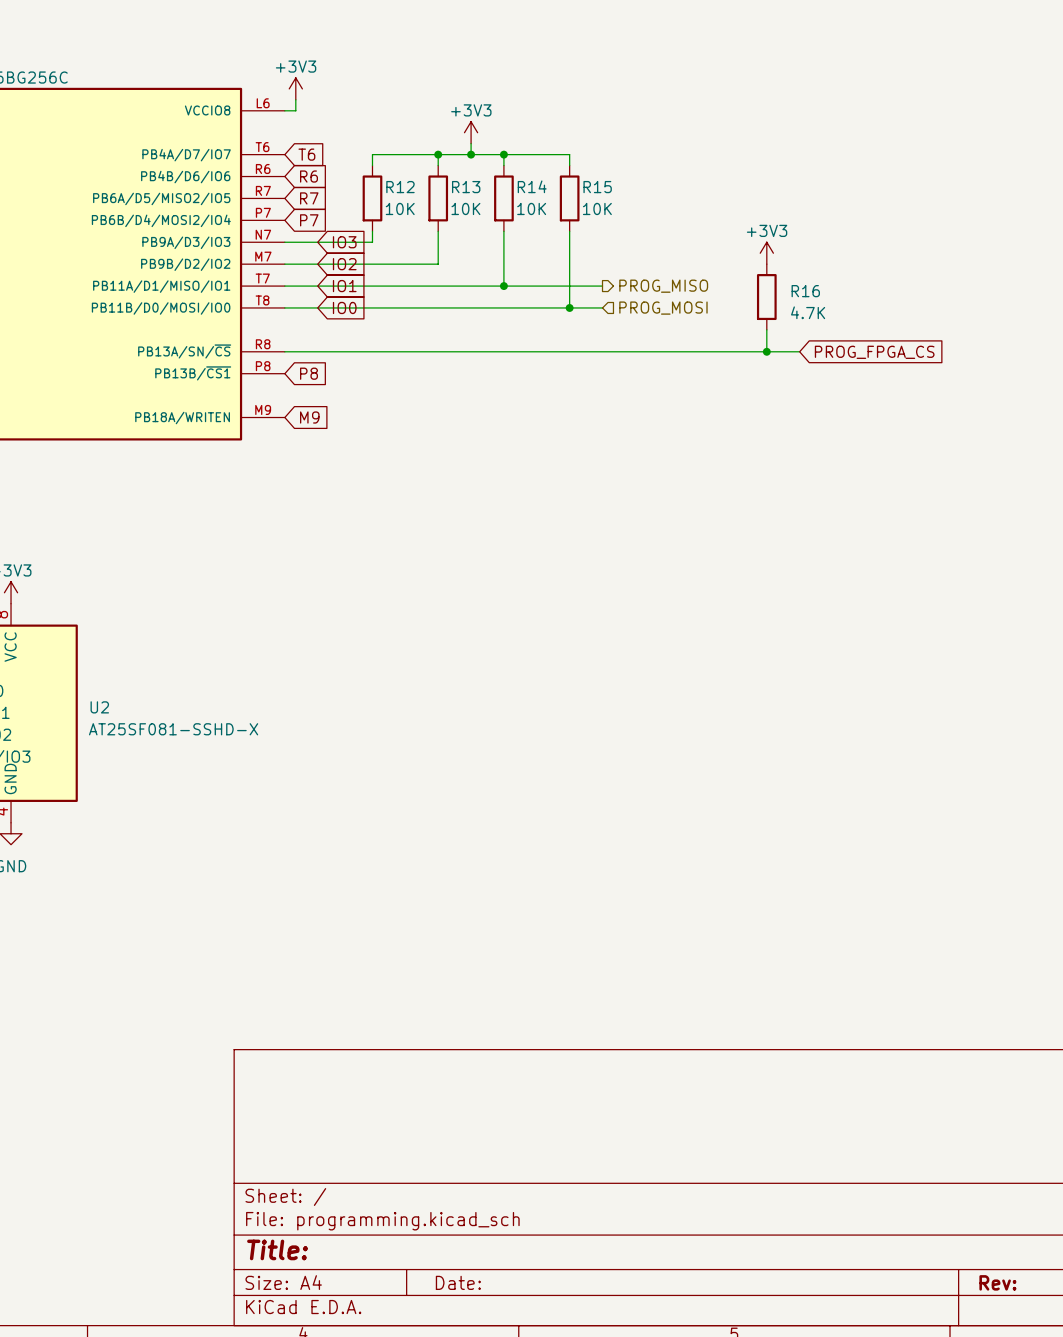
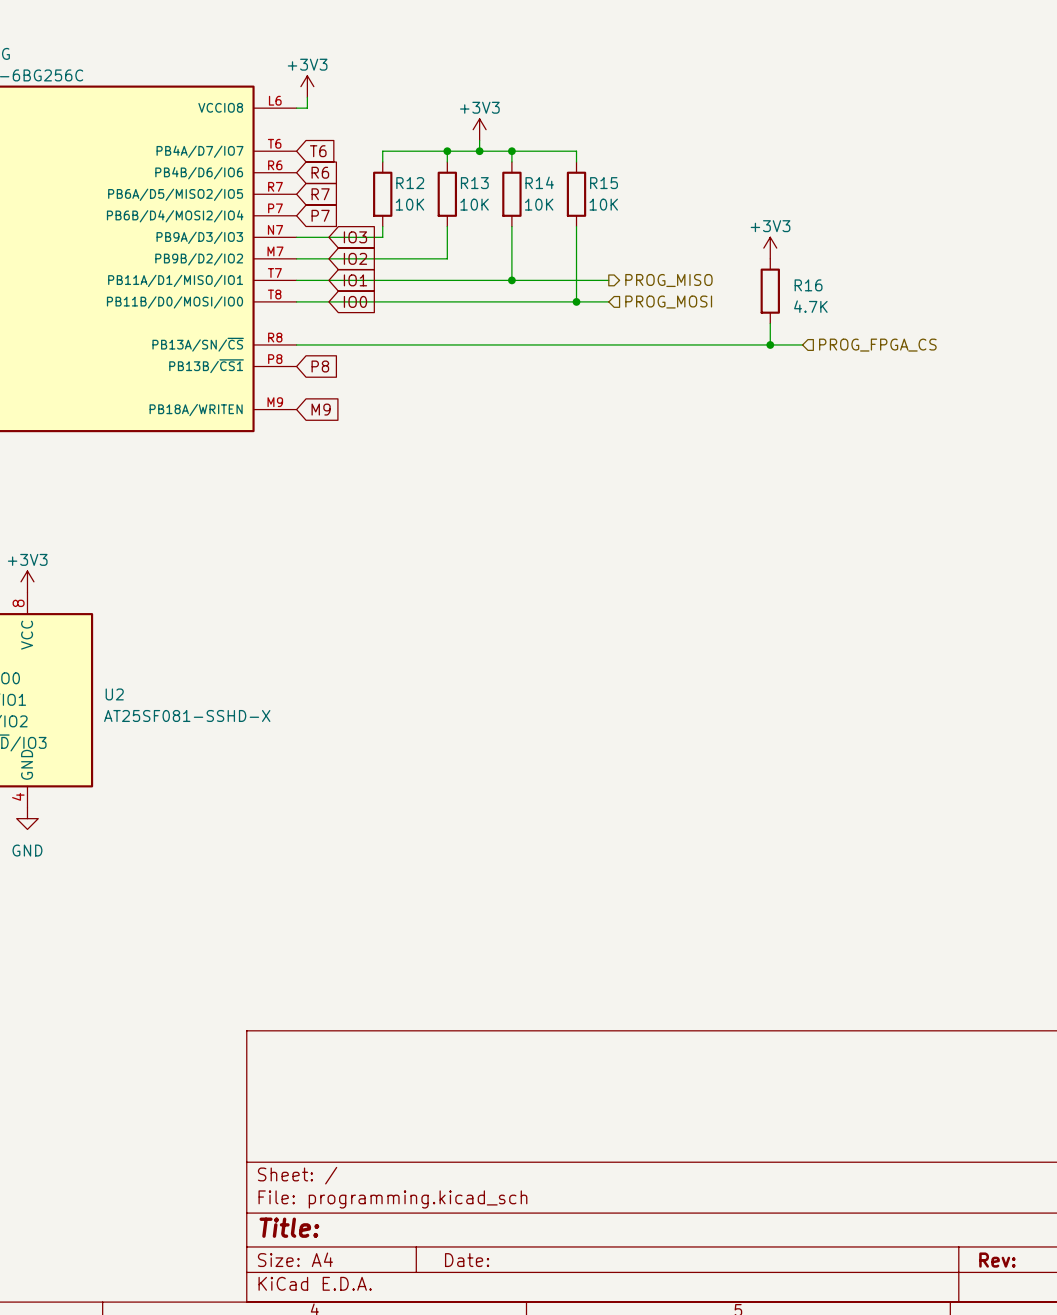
hierarchical label: none -> PROG_FPGA_CS (877, 345)
global label: PROG_FPGA_CS (874, 352) -> none

